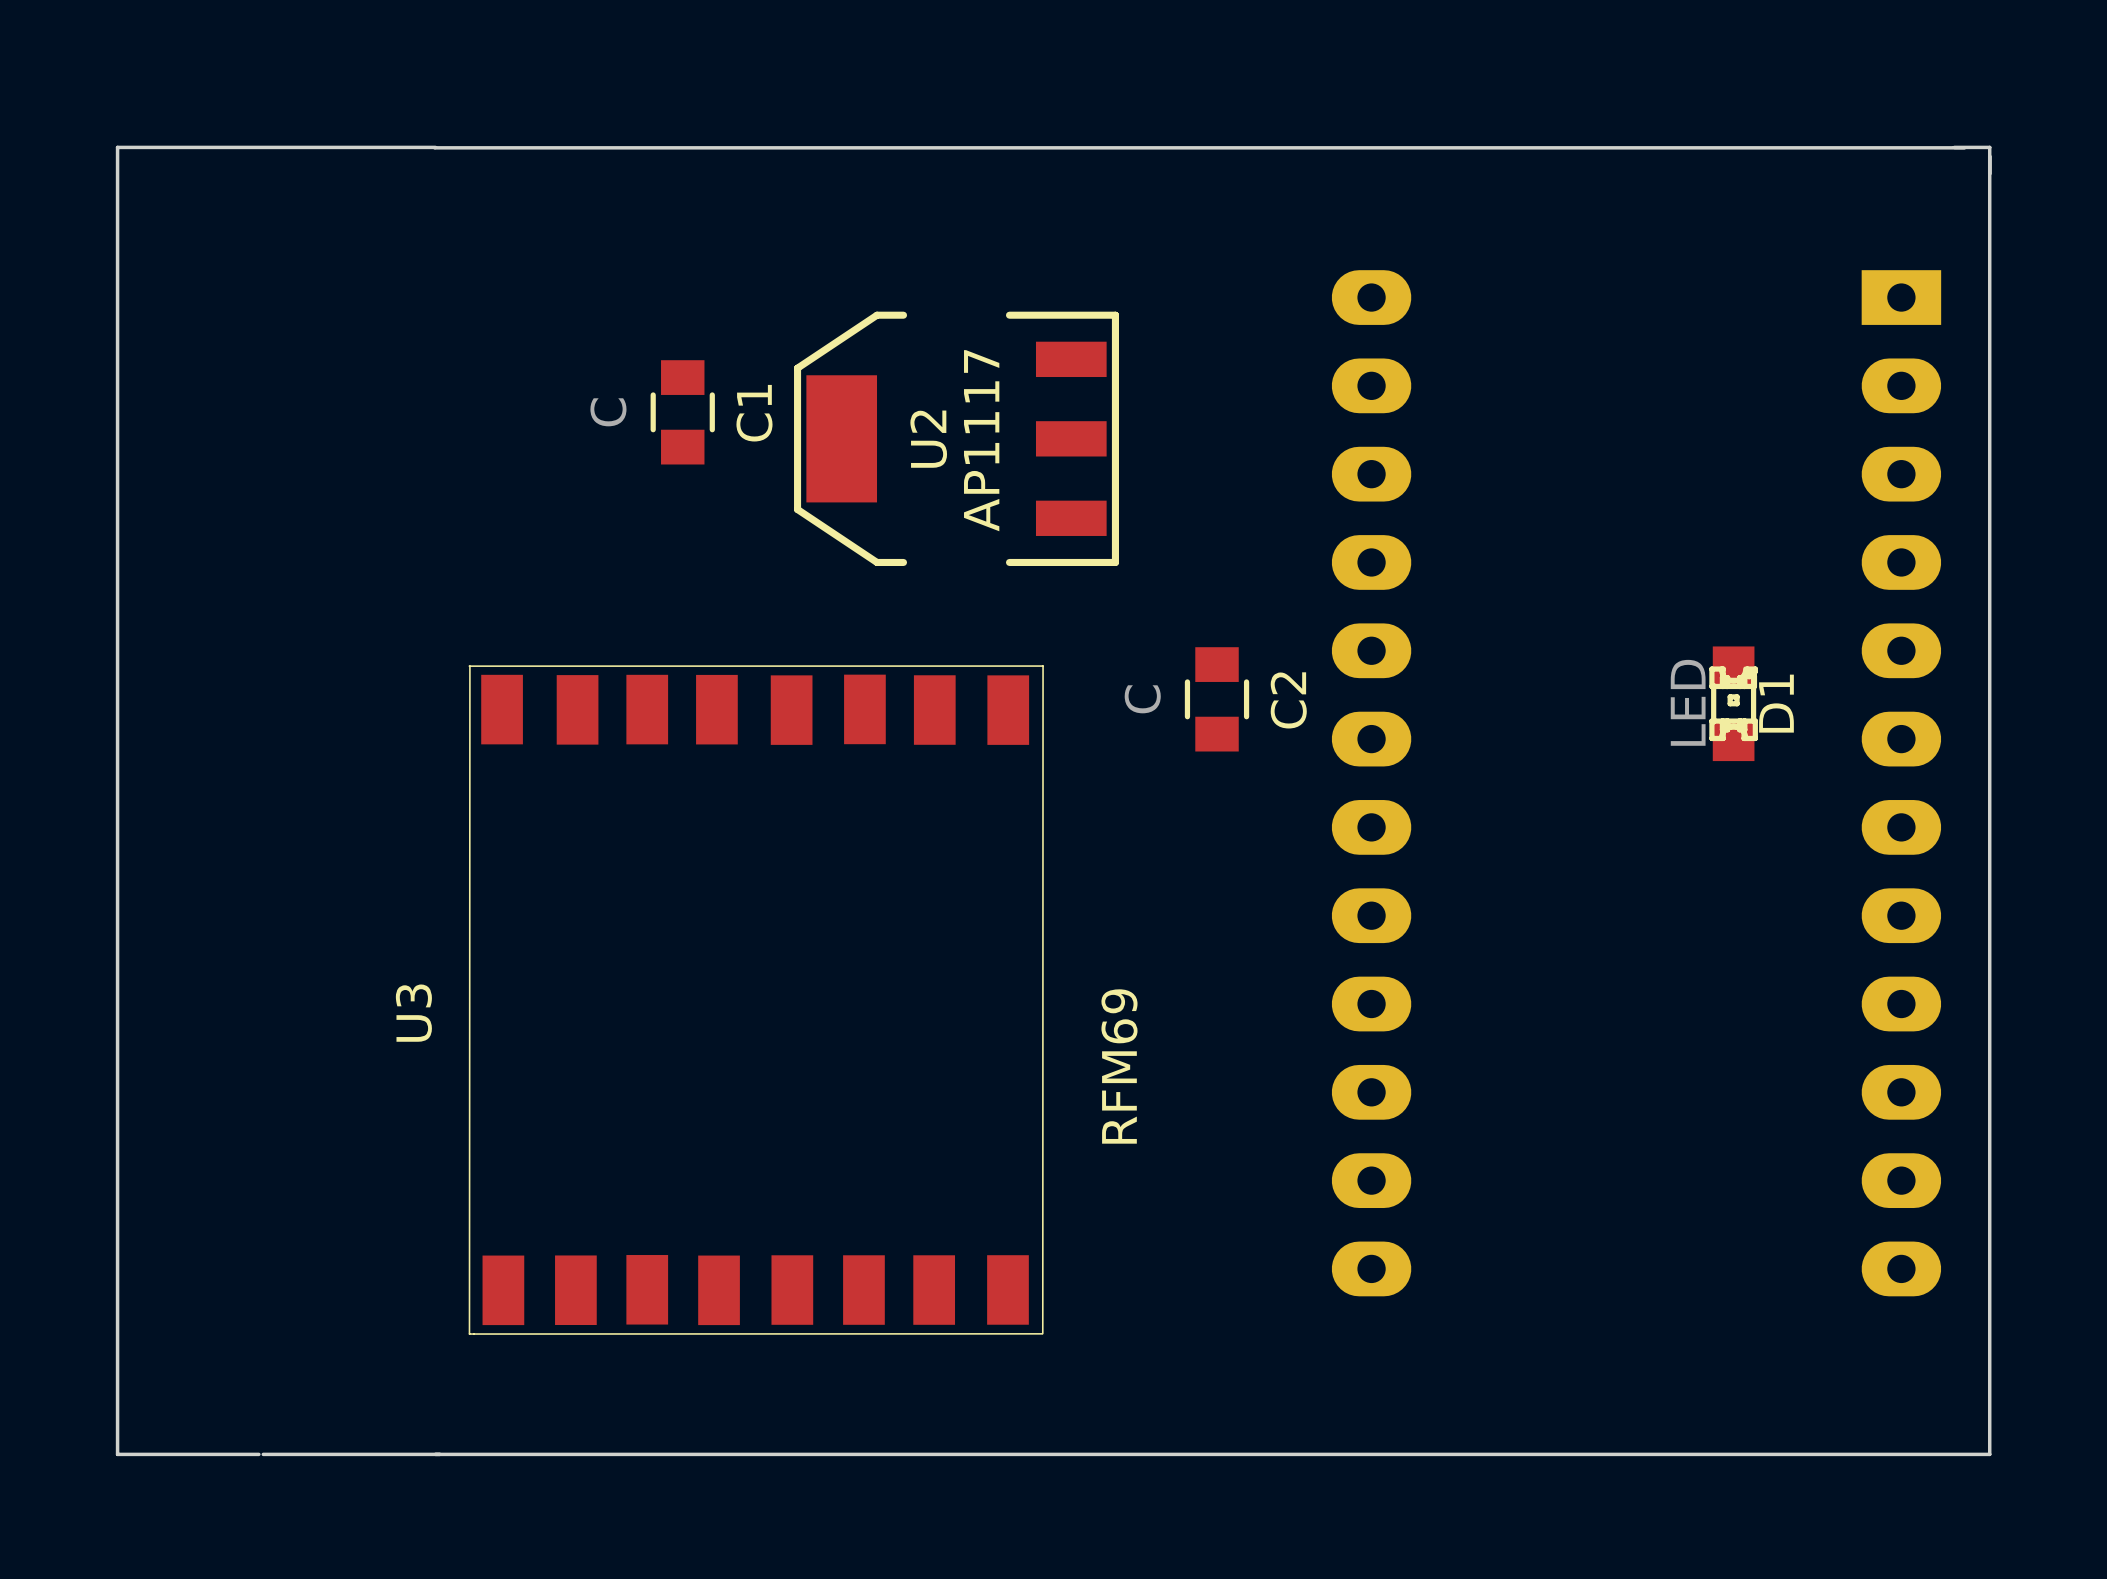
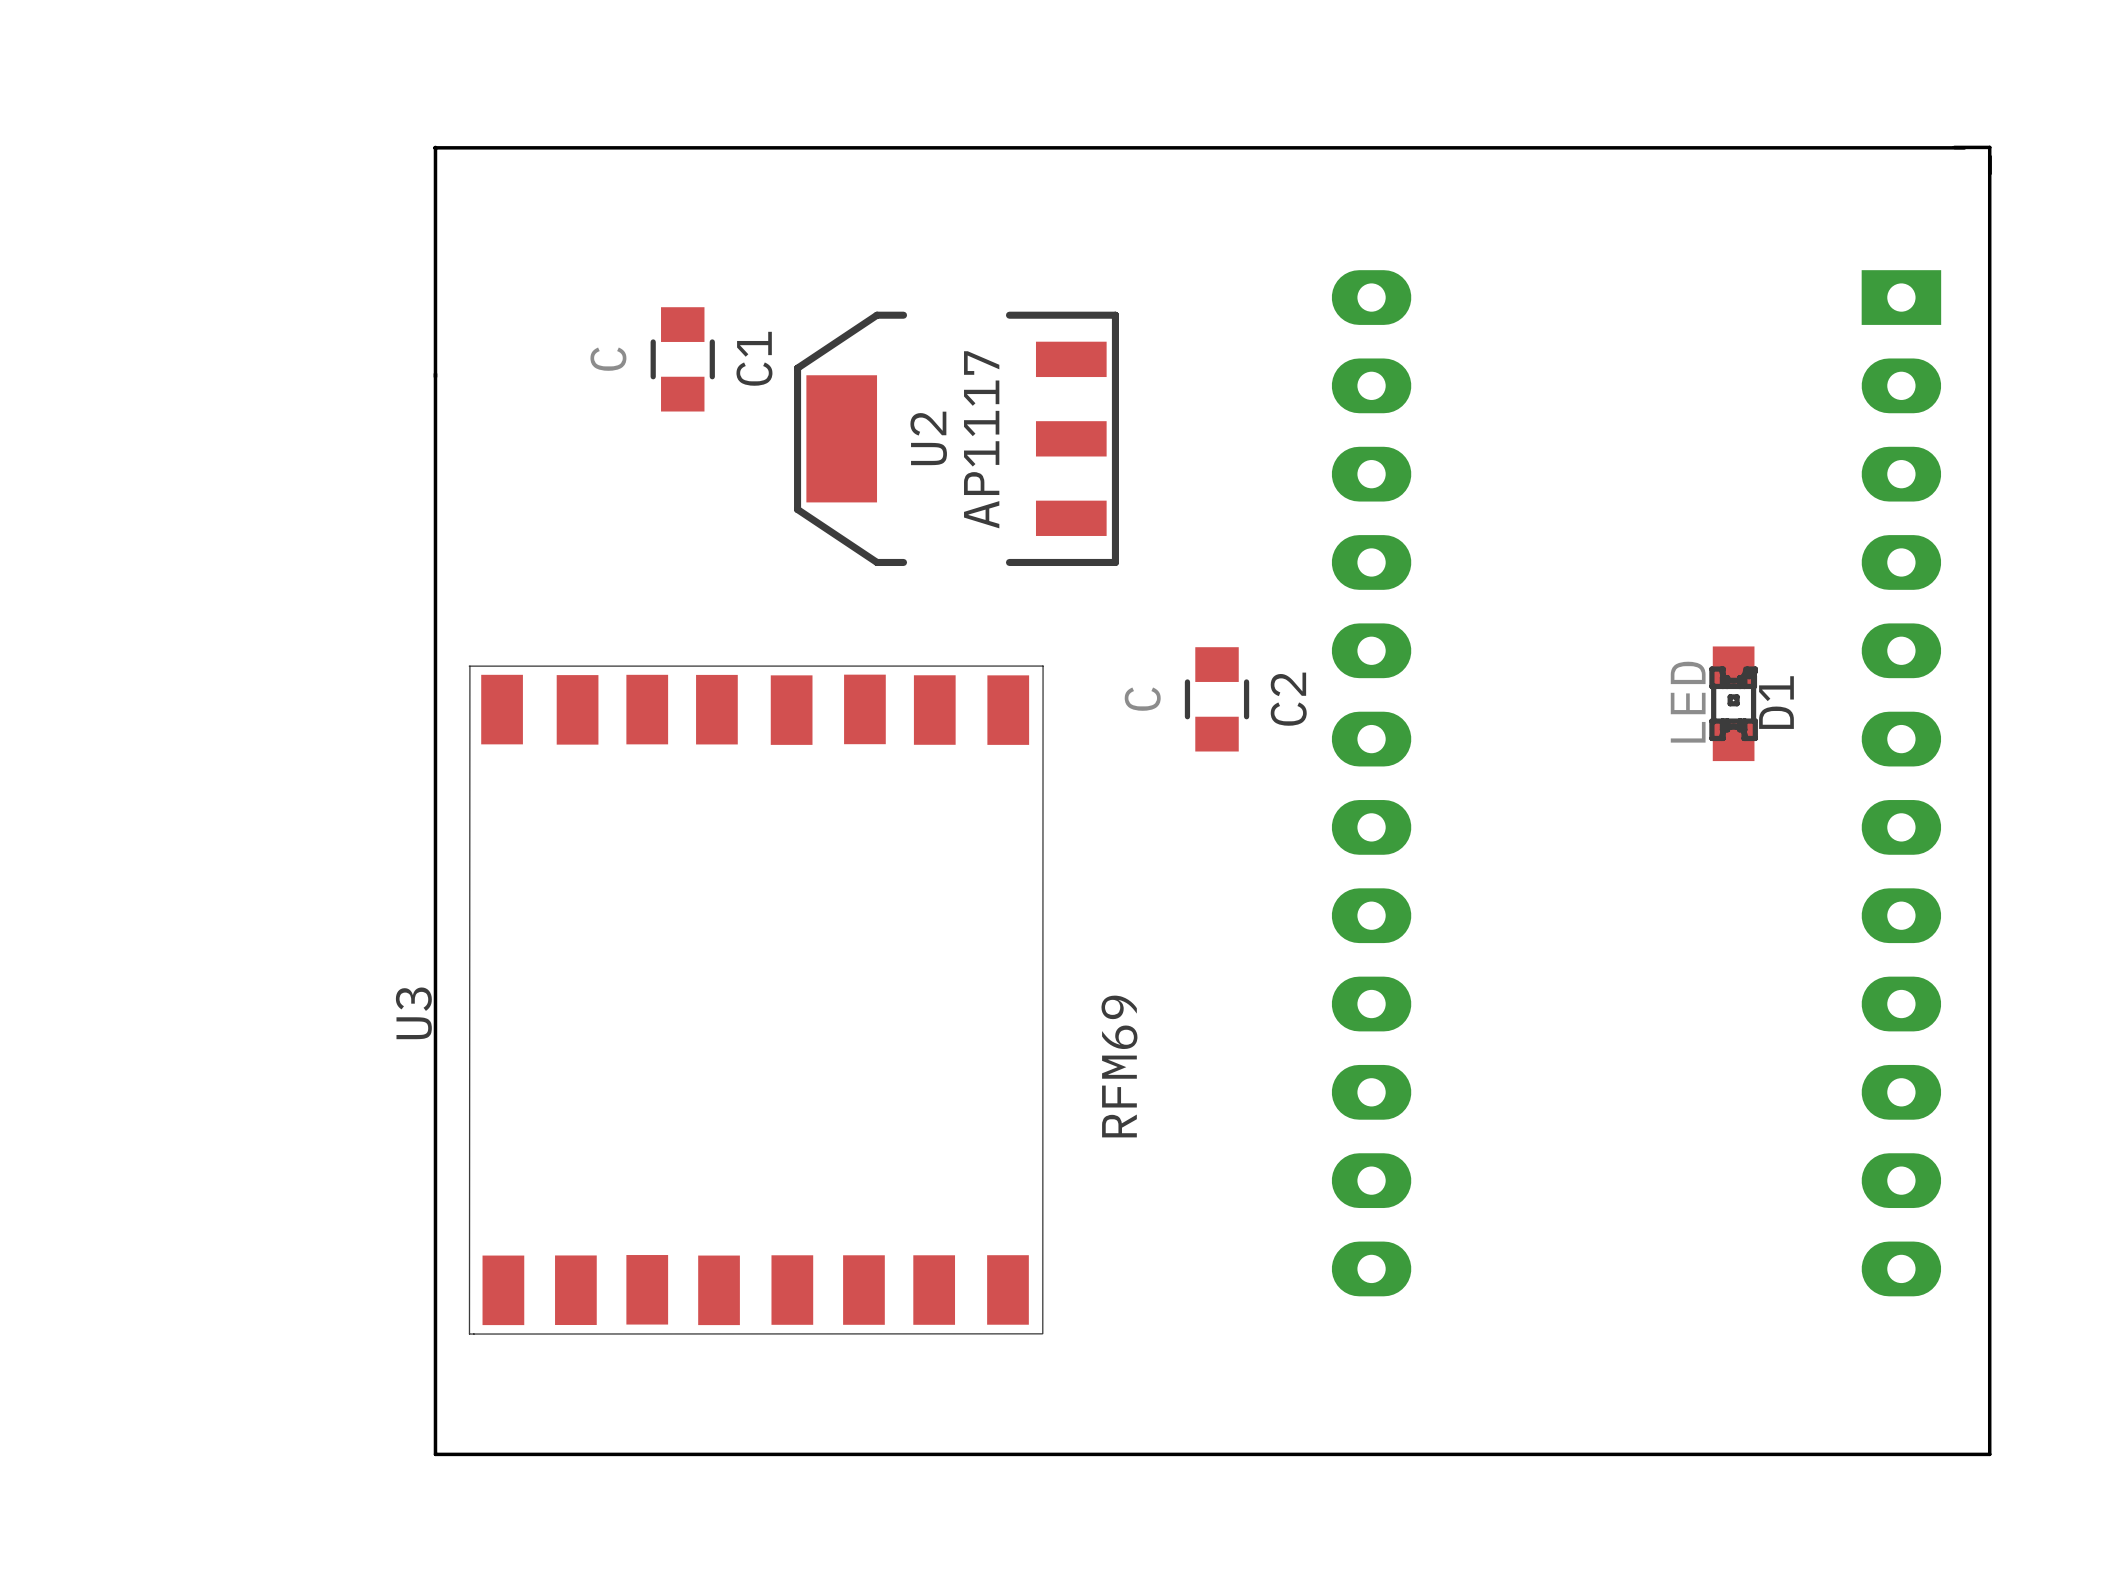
board edge: (435, 147) (117, 147) (117, 1454) (258, 1454) -> (435, 147) (435, 1454)
C1 position: (682, 412) -> (682, 359)
board edge: (263, 1454) (435, 1454) -> none

